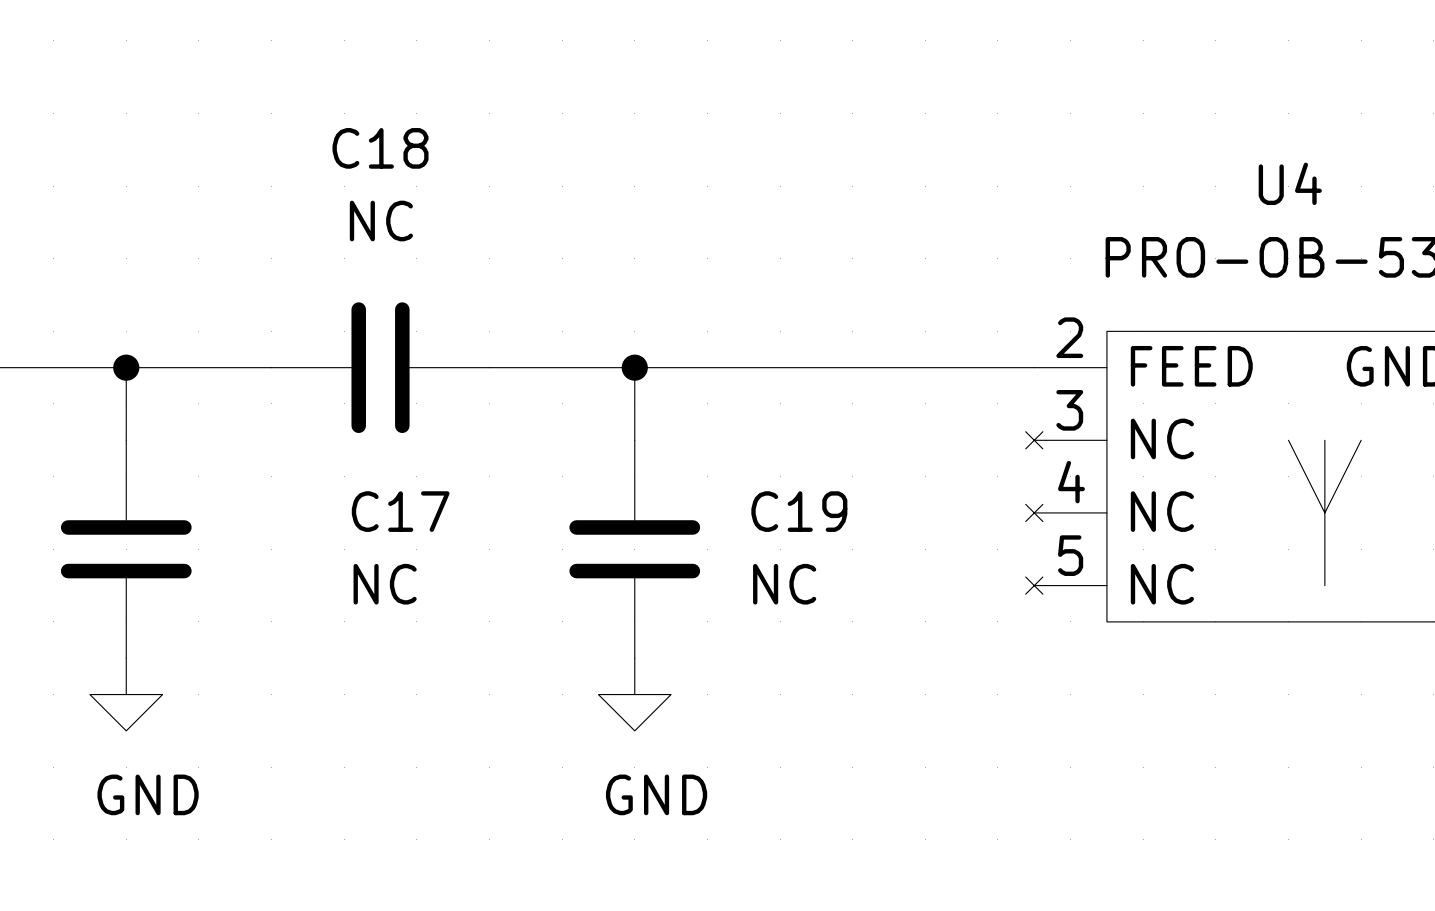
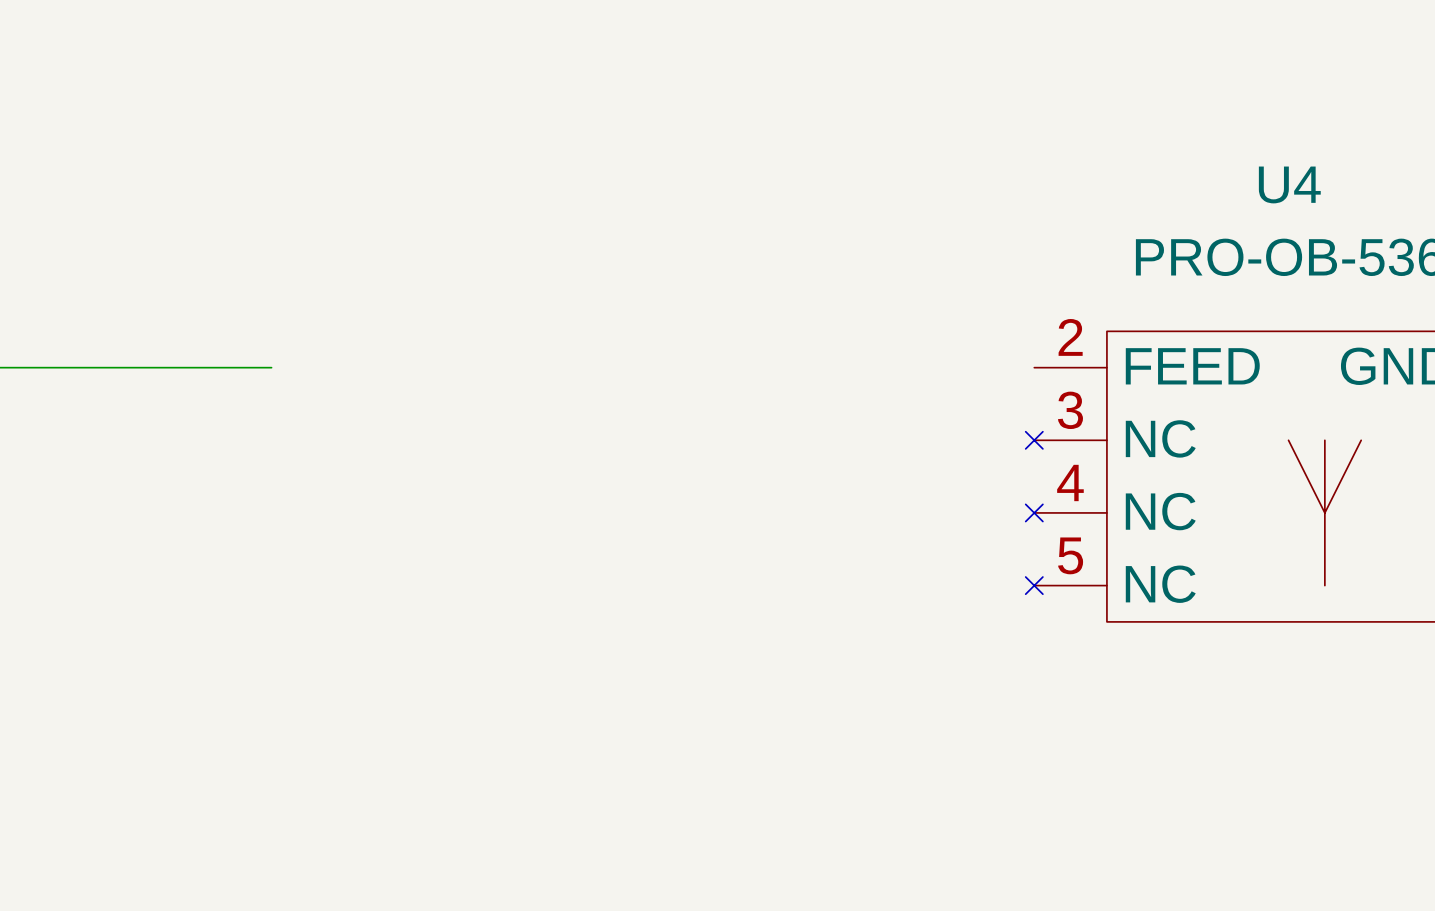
wire: (126, 367) (126, 440) -> none
junction: (126, 367) -> none
C18: NC (380, 367) -> none
wire: (489, 367) (1034, 367) -> none
wire: (634, 367) (634, 440) -> none
junction: (634, 367) -> none
C17: NC (126, 549) -> none
C19: NC (634, 549) -> none
power symbol: GND (126, 694) -> none
power symbol: GND (634, 694) -> none

